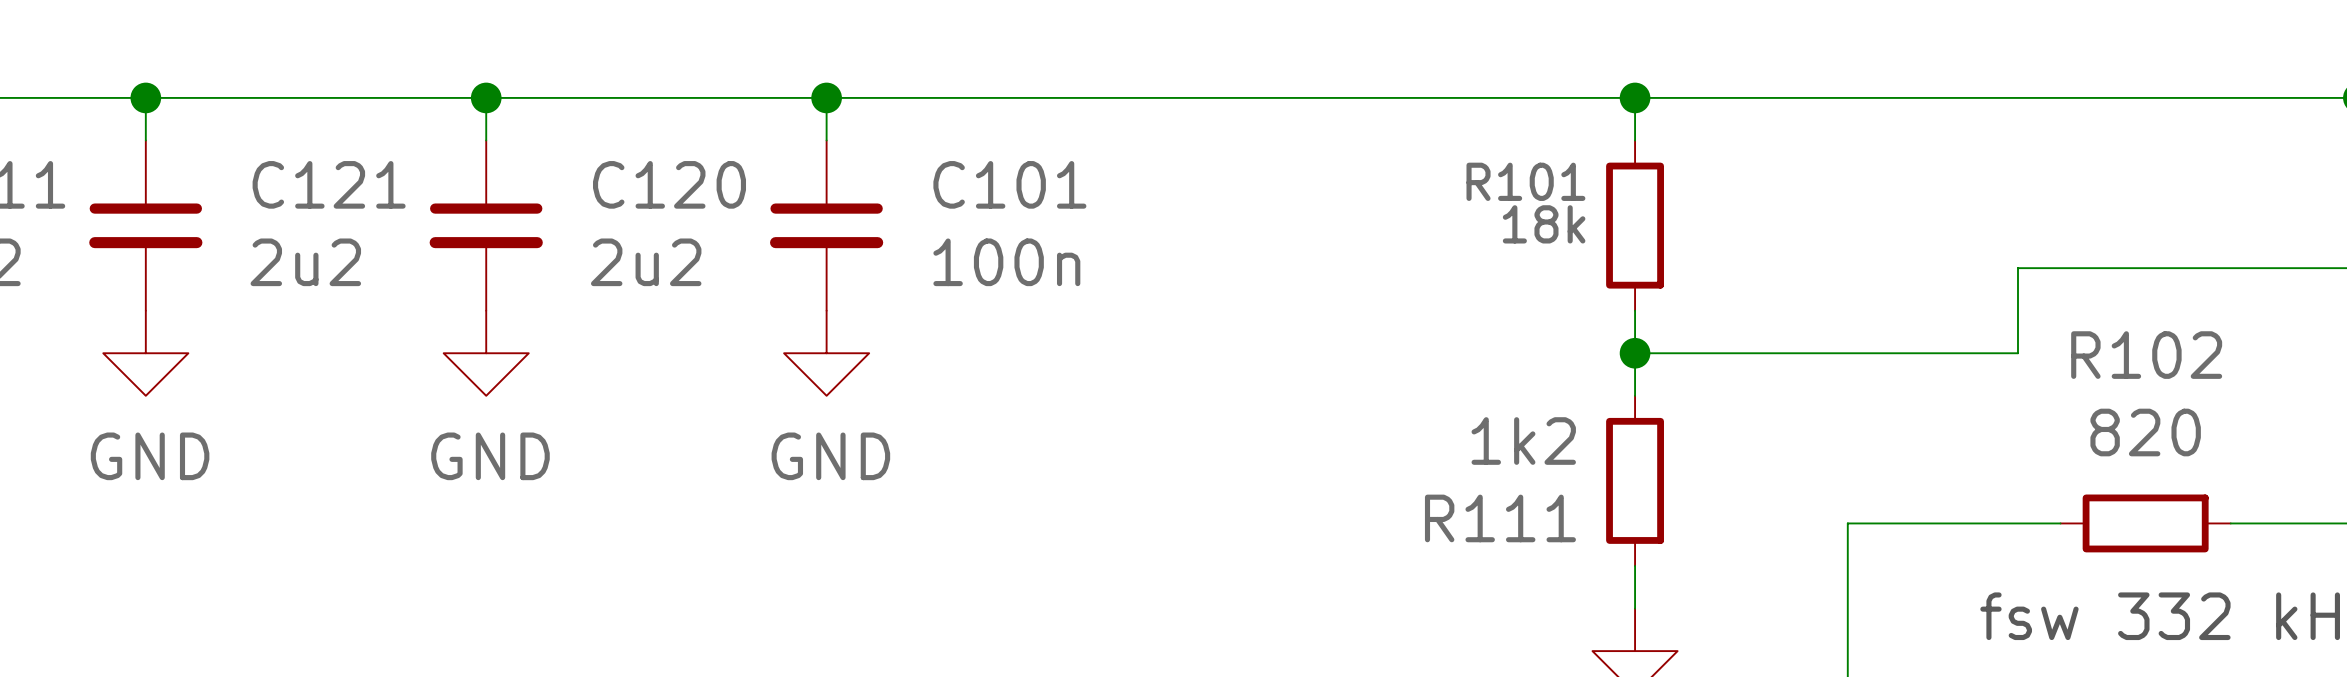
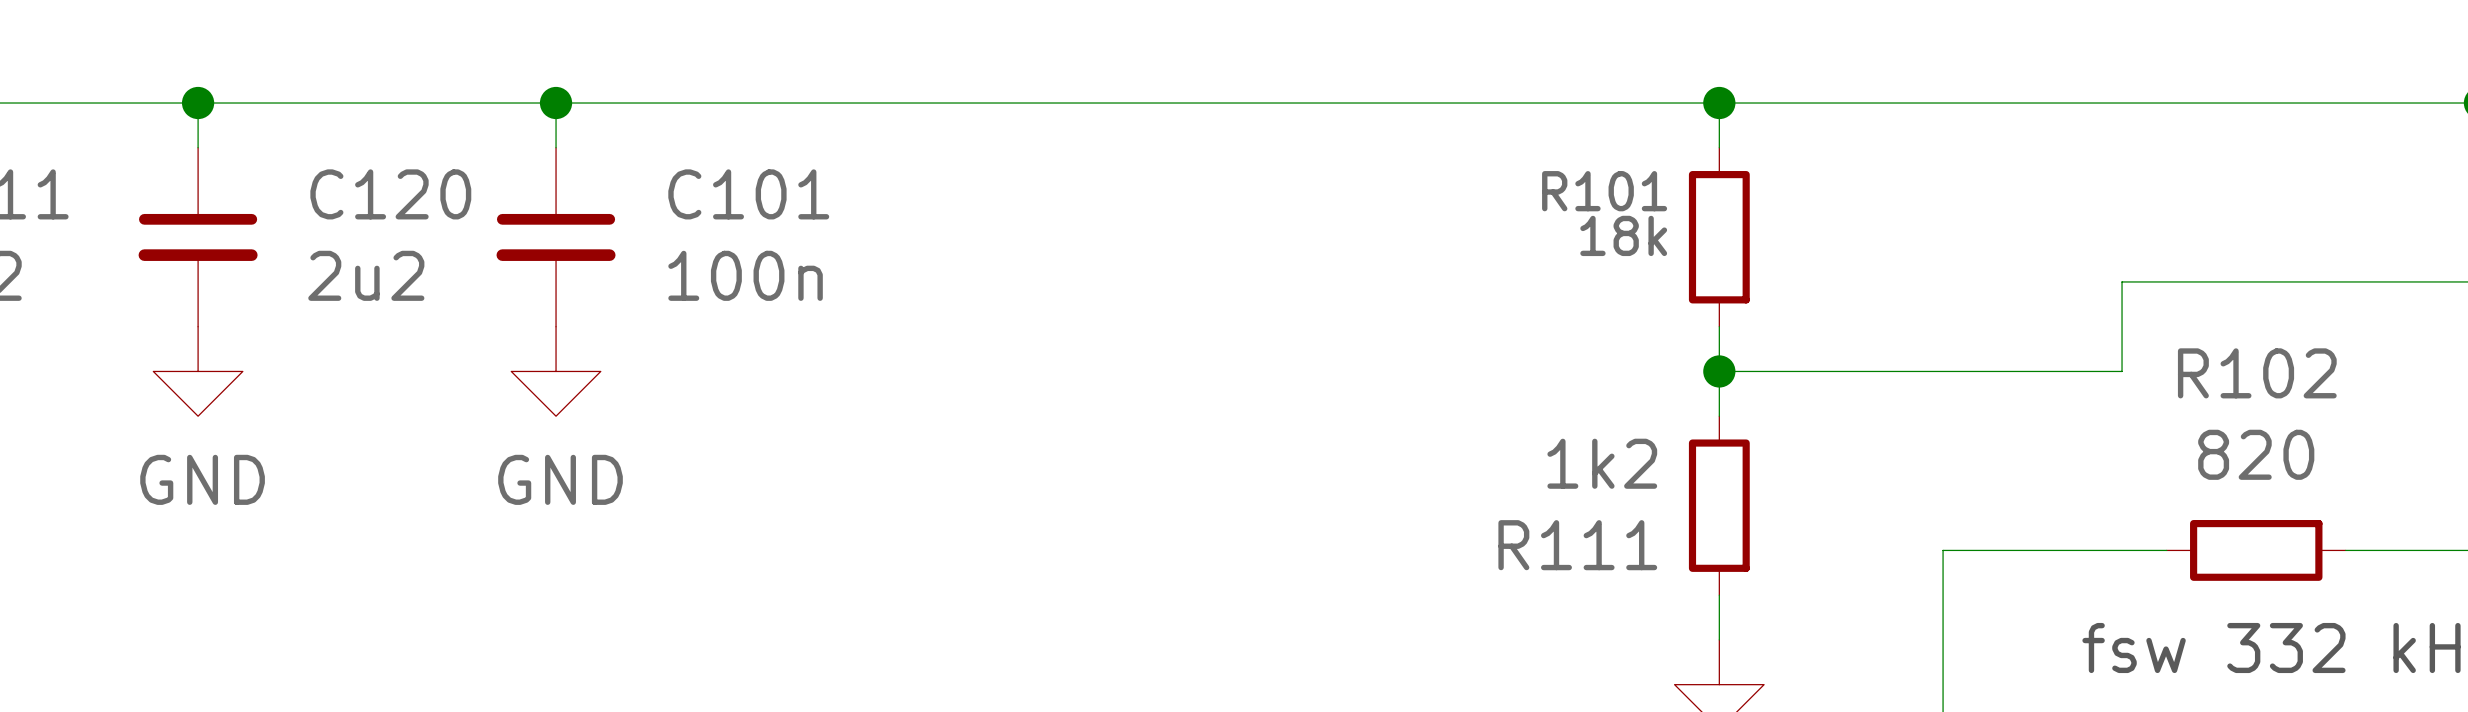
wire: (145, 97) (145, 140) -> (198, 103) (198, 147)
junction position: (145, 97) -> (198, 103)
wire: (486, 97) (486, 140) -> (556, 103) (556, 147)
junction position: (486, 97) -> (556, 103)
wire: (826, 97) (826, 140) -> none
junction: (826, 97) -> none
C121: 2u2 (145, 225) -> none
C120 position: (486, 225) -> (198, 237)
C101 position: (826, 225) -> (556, 237)
power symbol position: GND (145, 353) -> GND (198, 371)
power symbol position: GND (486, 353) -> GND (556, 371)
power symbol: GND (826, 353) -> none

